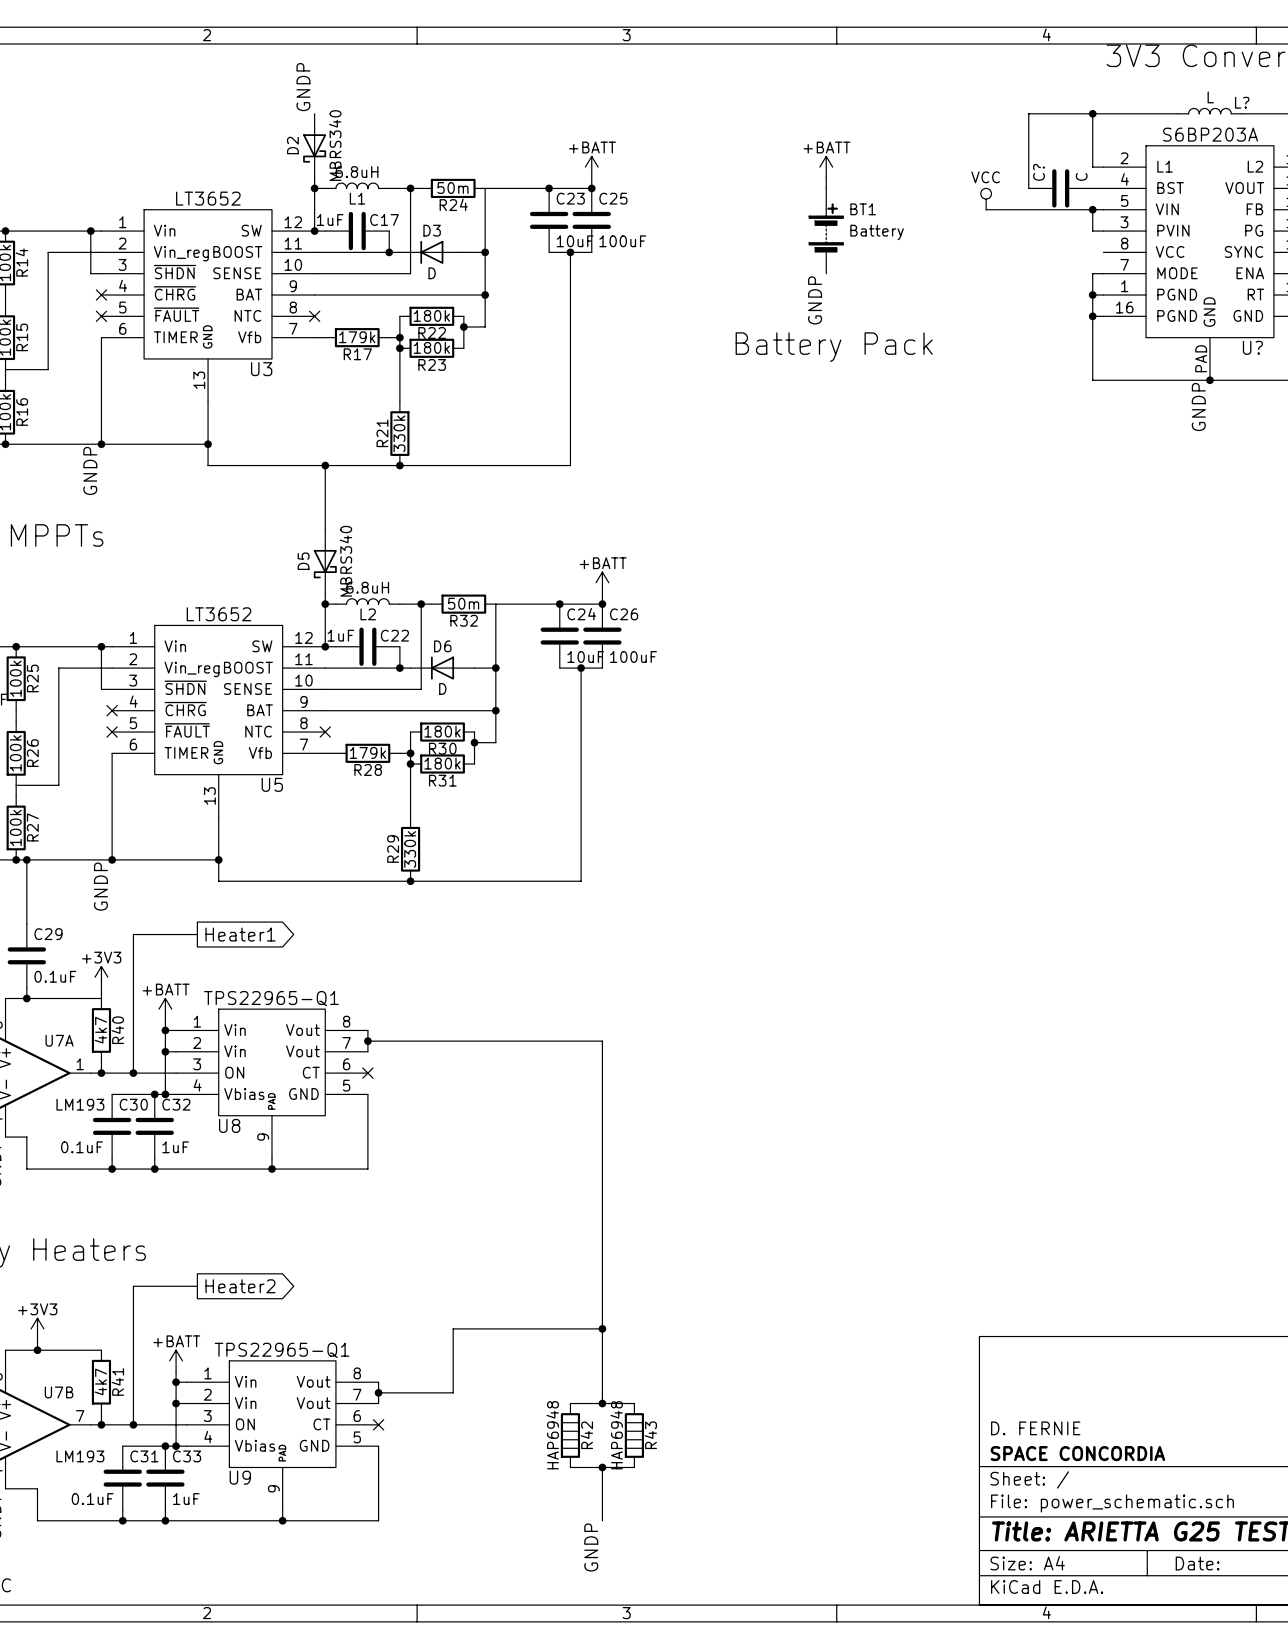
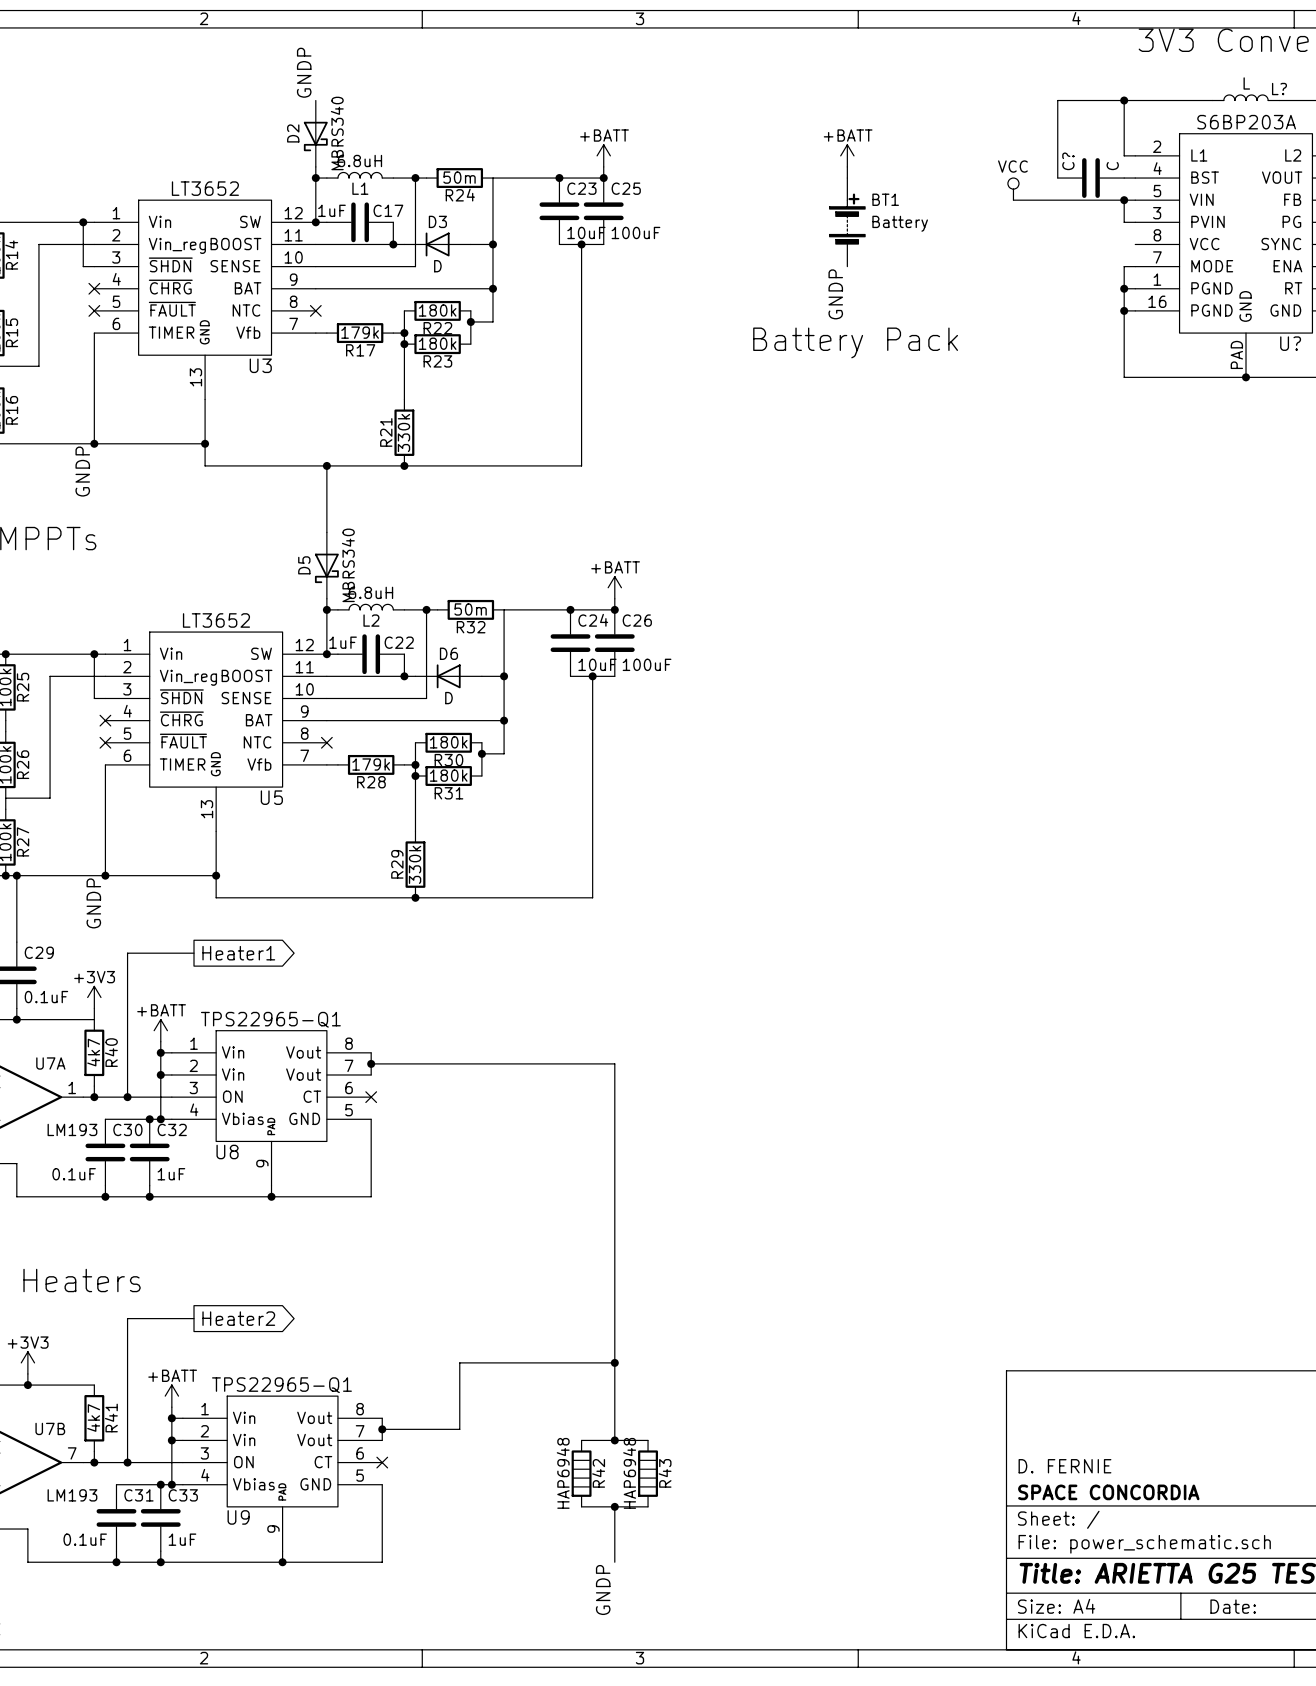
label: GNDP (1198, 407) -> none

